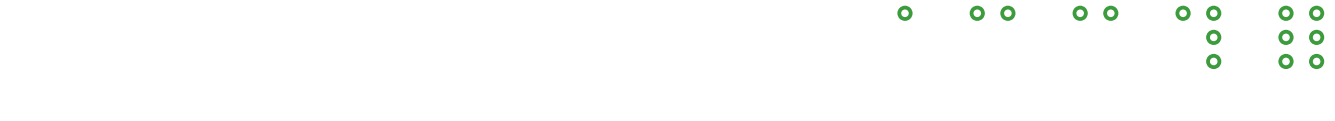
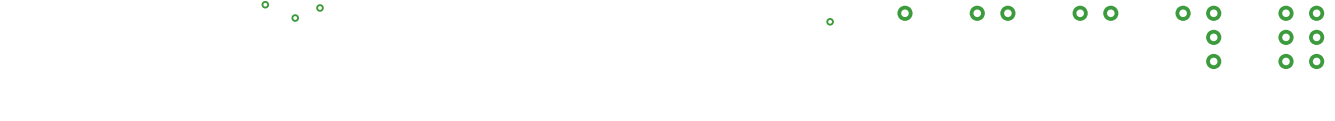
via: none -> (265, 4)
via: none -> (319, 7)
via: none -> (295, 18)
via: none -> (830, 21)

